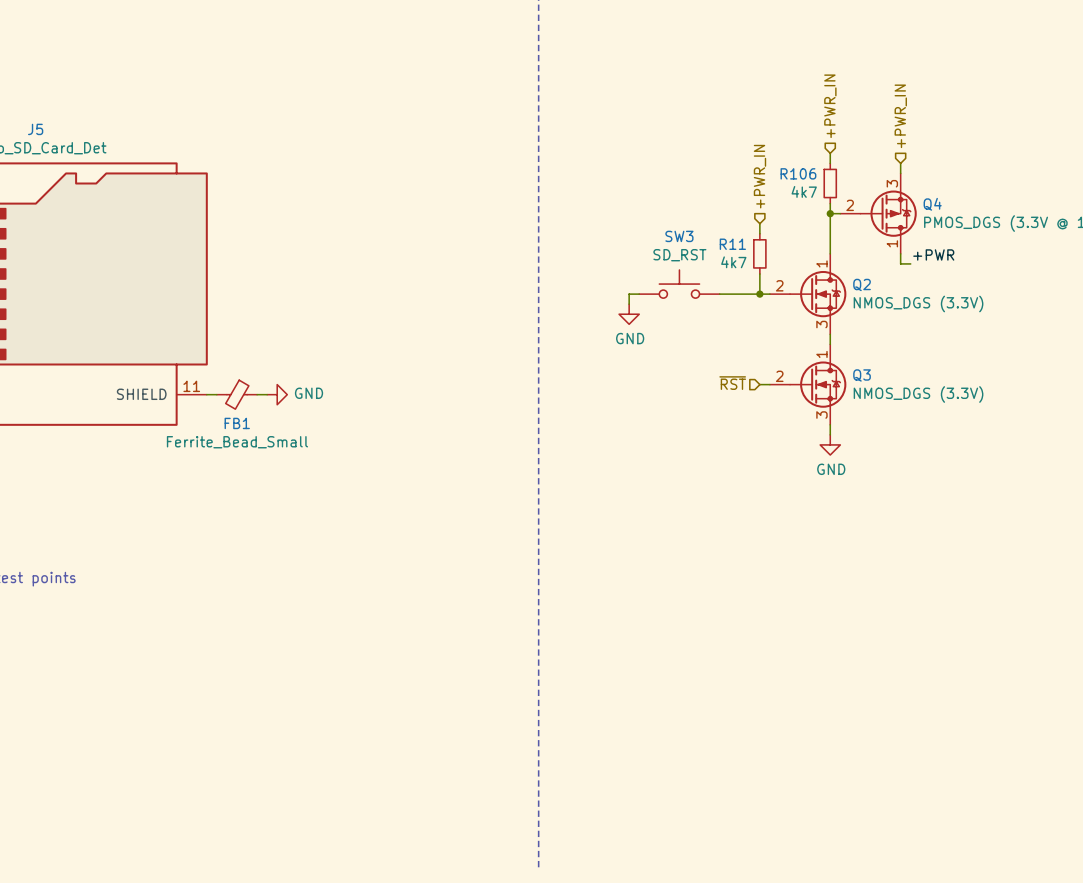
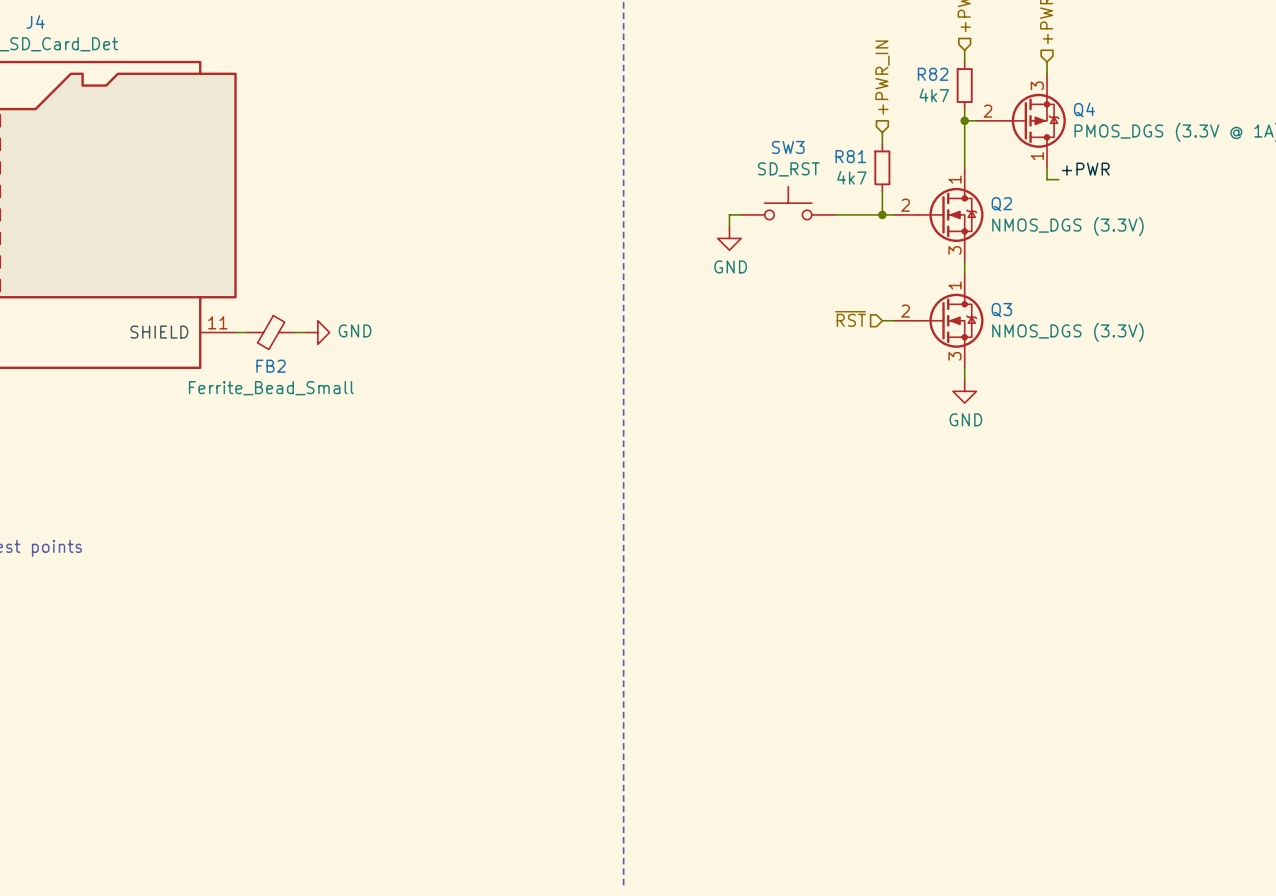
J5 name: J5 (35, 129) -> J4 (35, 22)
R106 name: R106 (798, 173) -> R82 (933, 74)
R11 name: R11 (732, 244) -> R81 (850, 156)
FB1 name: FB1 (237, 423) -> FB2 (271, 366)

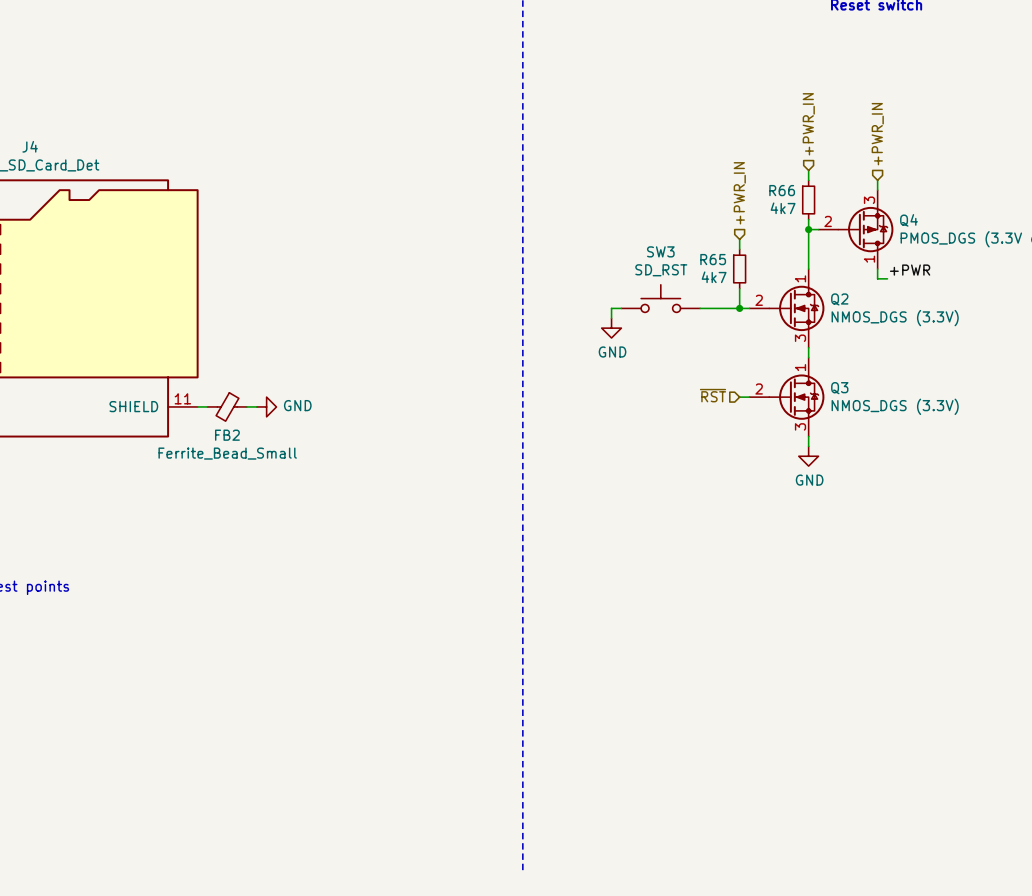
R82 name: R82 (933, 74) -> R66 (782, 190)
R81 name: R81 (850, 156) -> R65 (713, 259)

